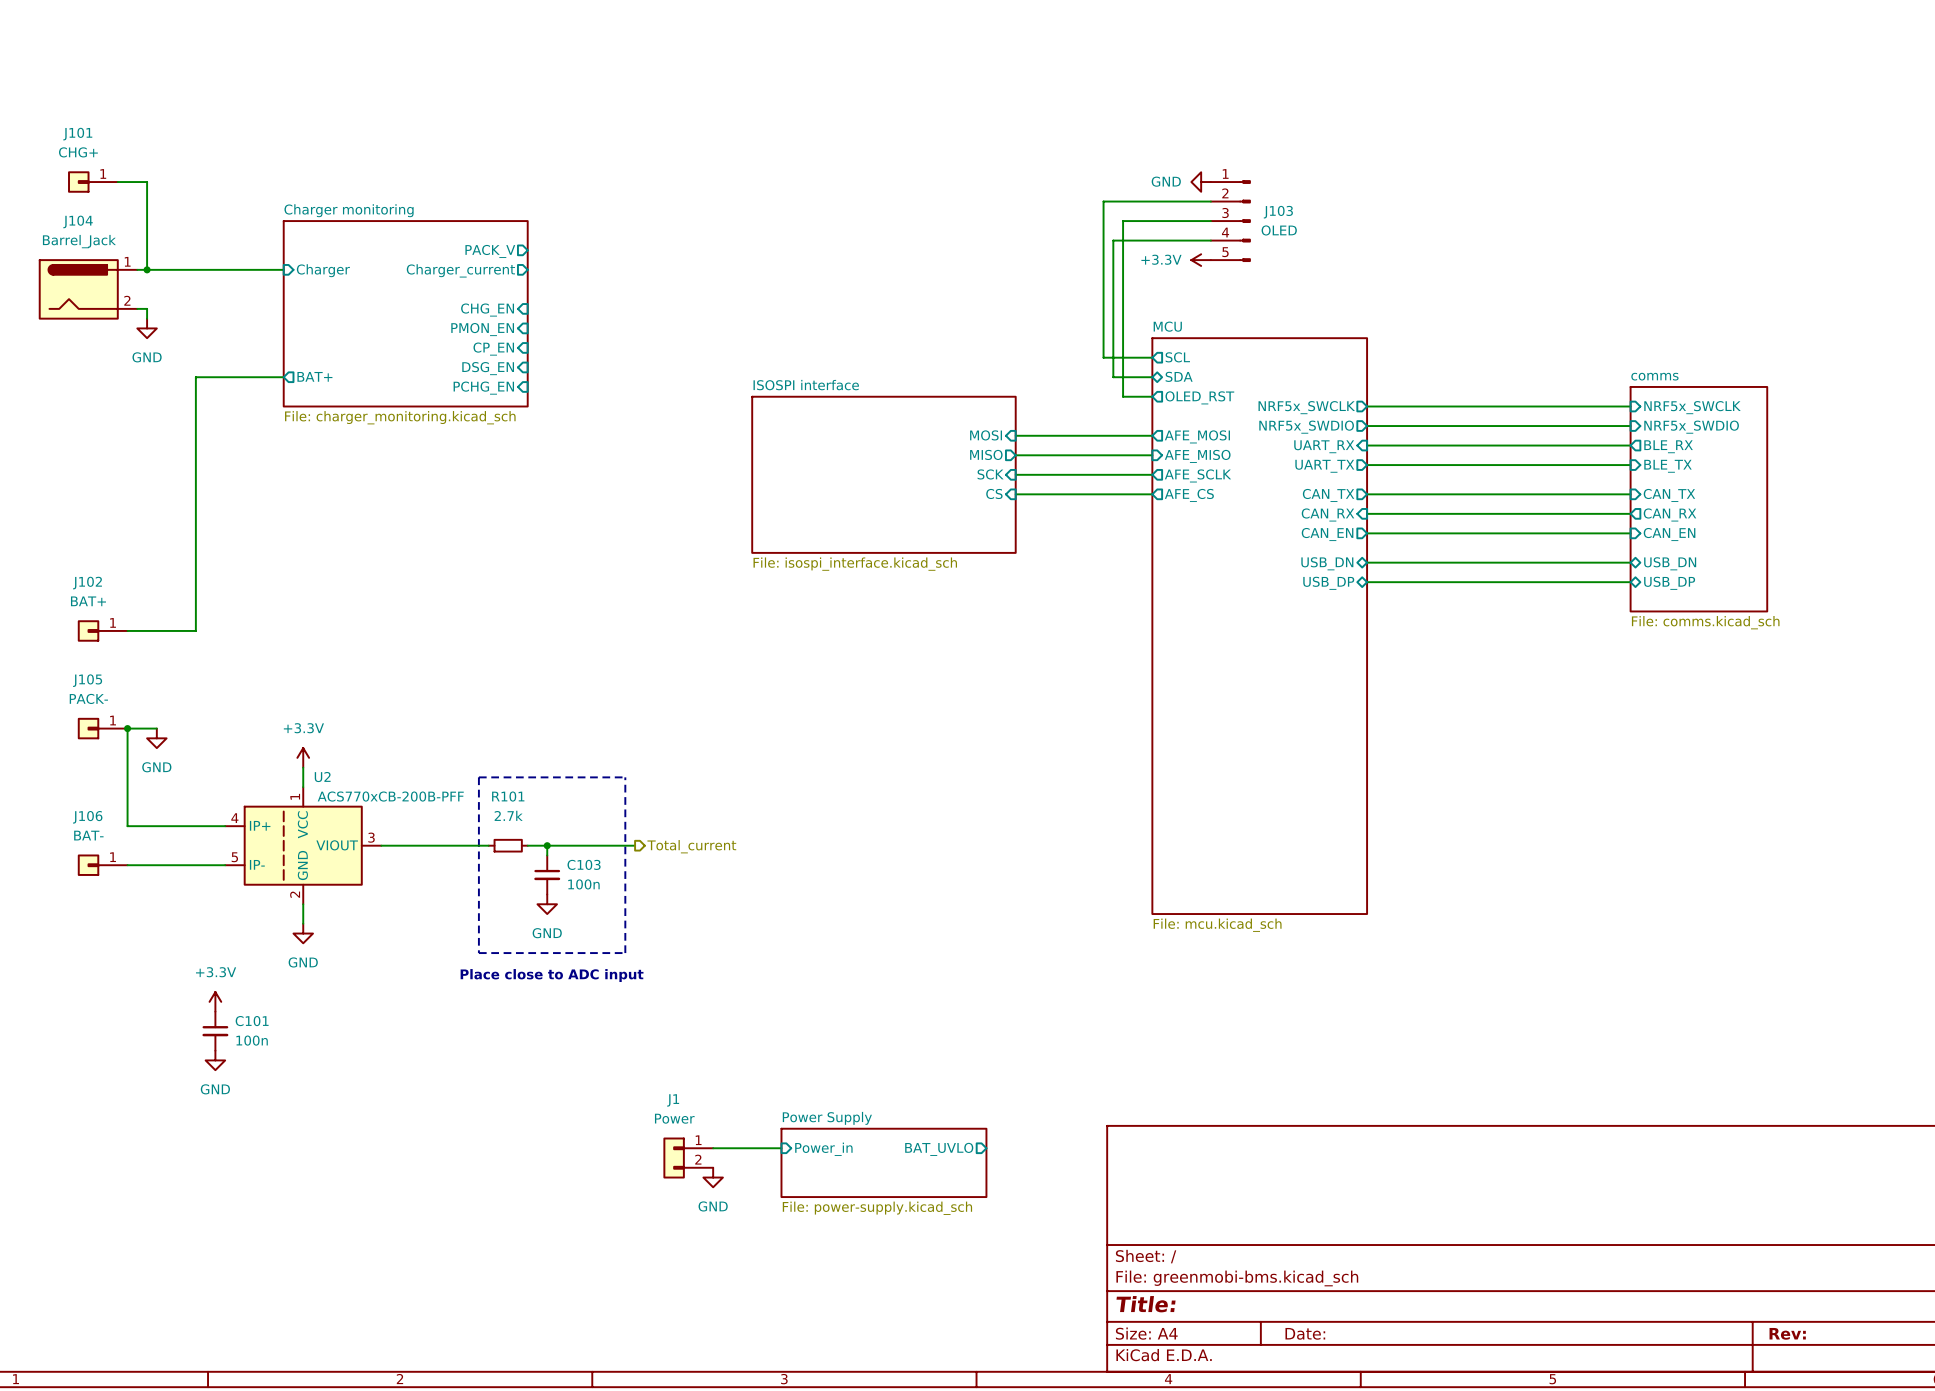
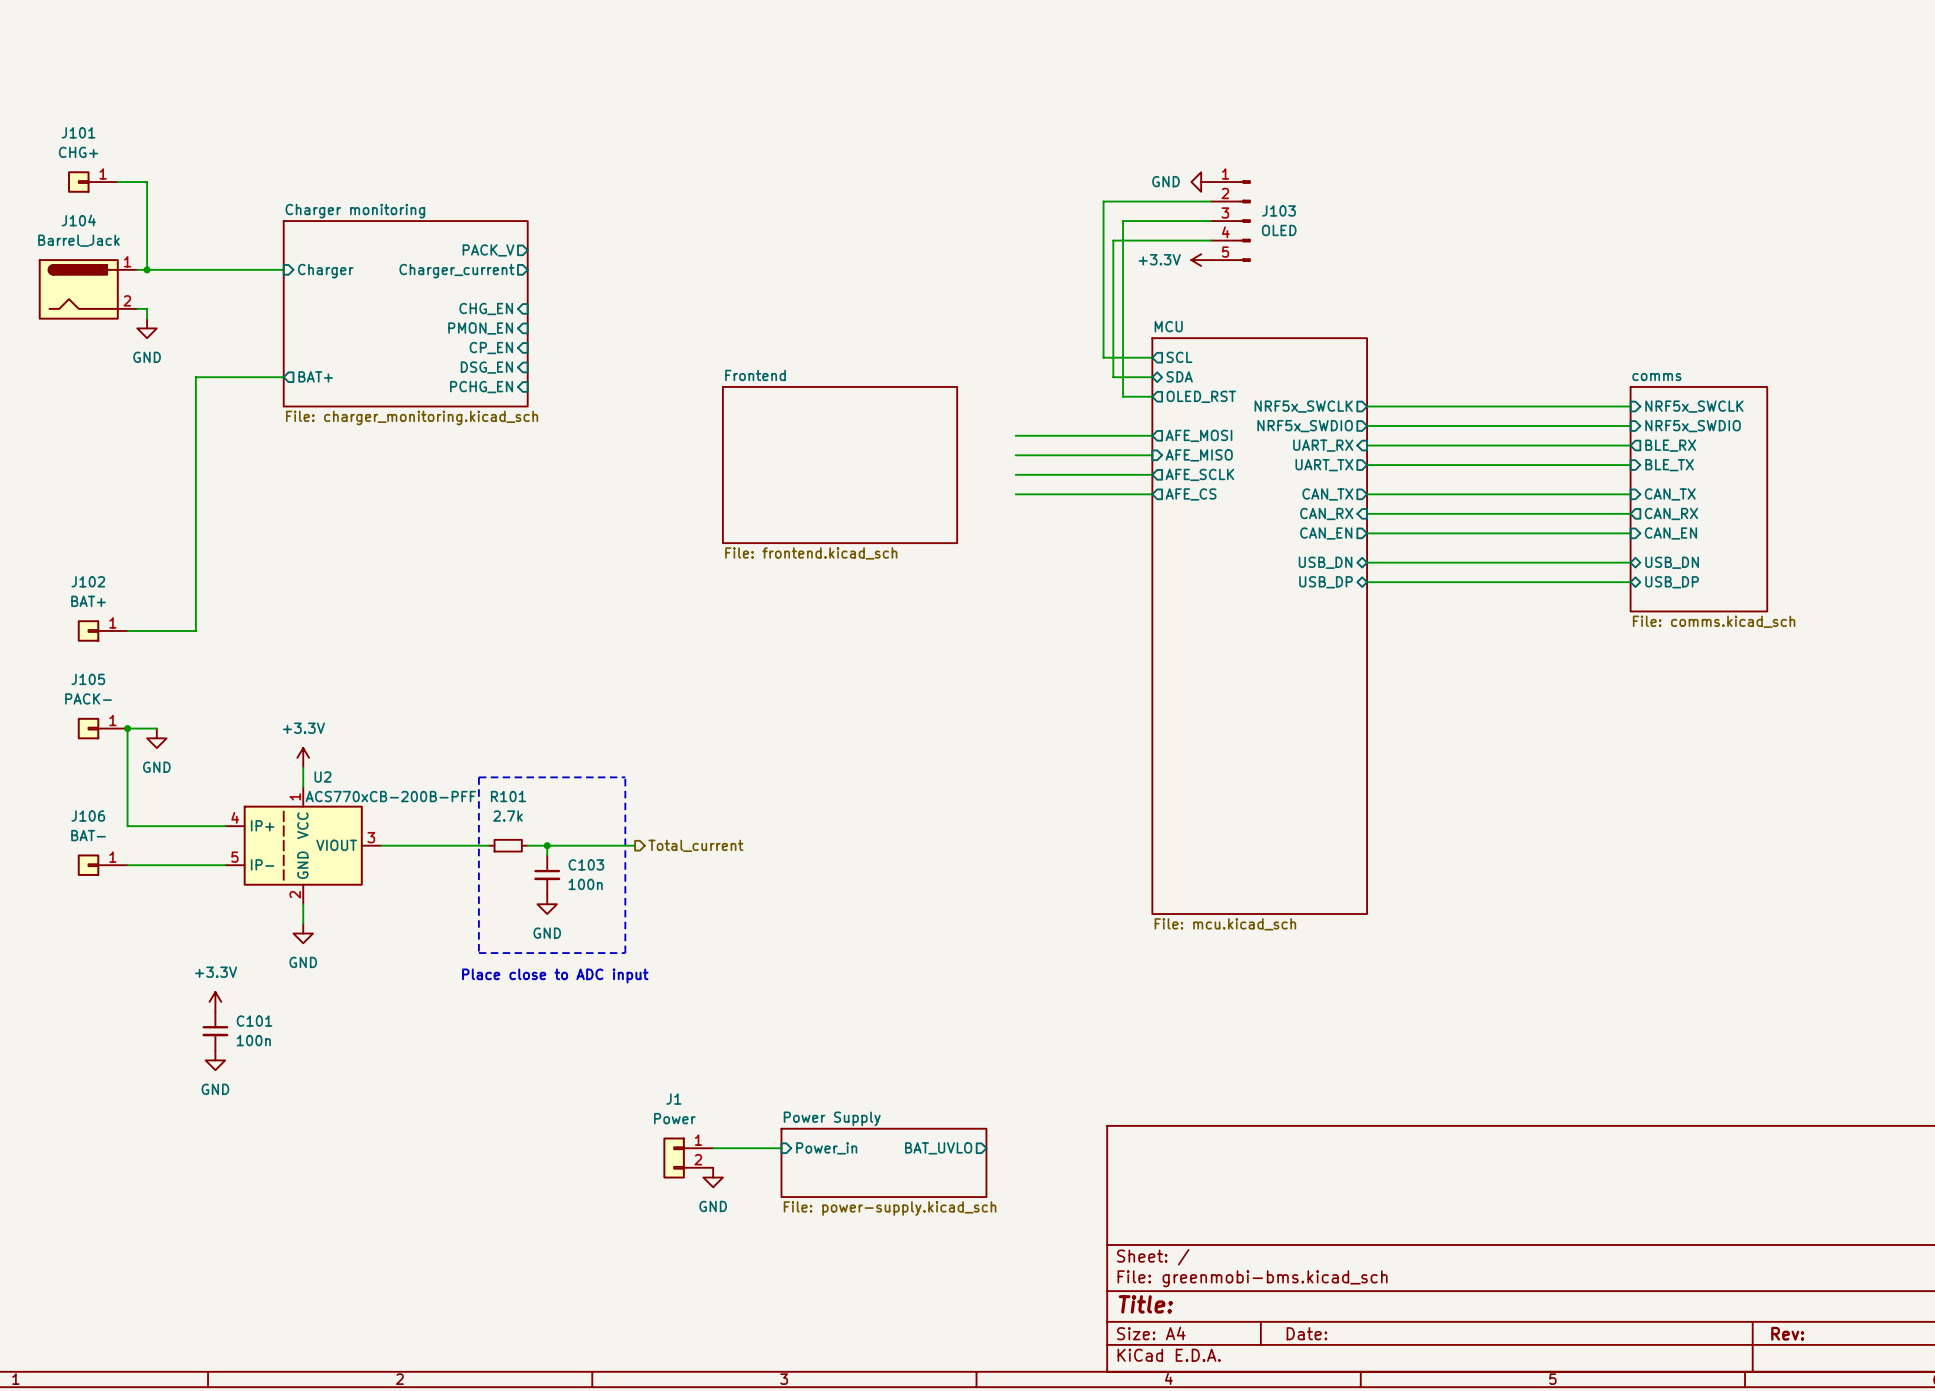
sheet pin: MOSI (986, 435) -> none
sheet pin: MISO (986, 454) -> none
sheet Frontend: none -> File: frontend.kicad_sch (840, 465)
sheet ISOSPI interface: File: isospi_interface.kicad_sch (883, 474) -> none
sheet pin: SCK (990, 474) -> none
sheet pin: CS (994, 493) -> none

